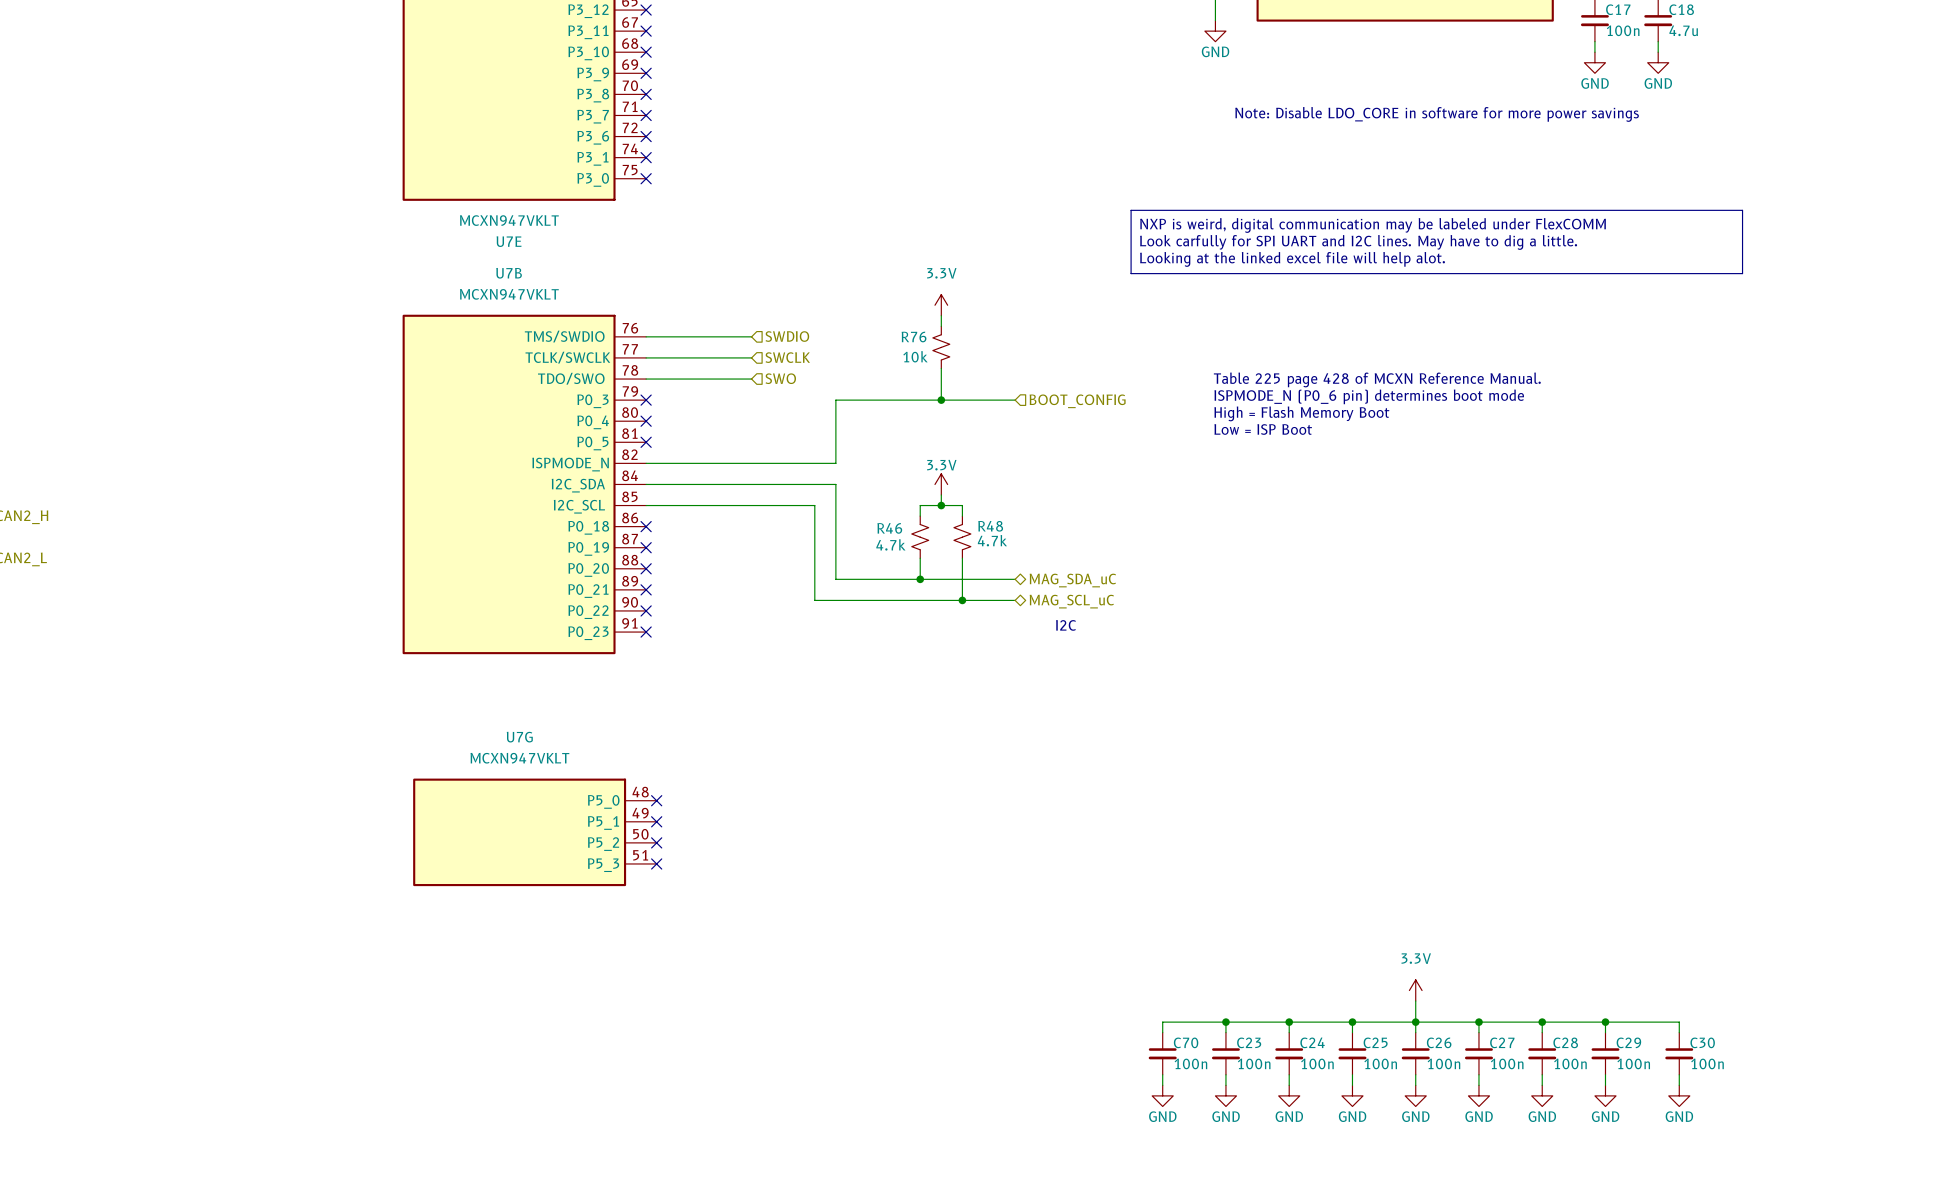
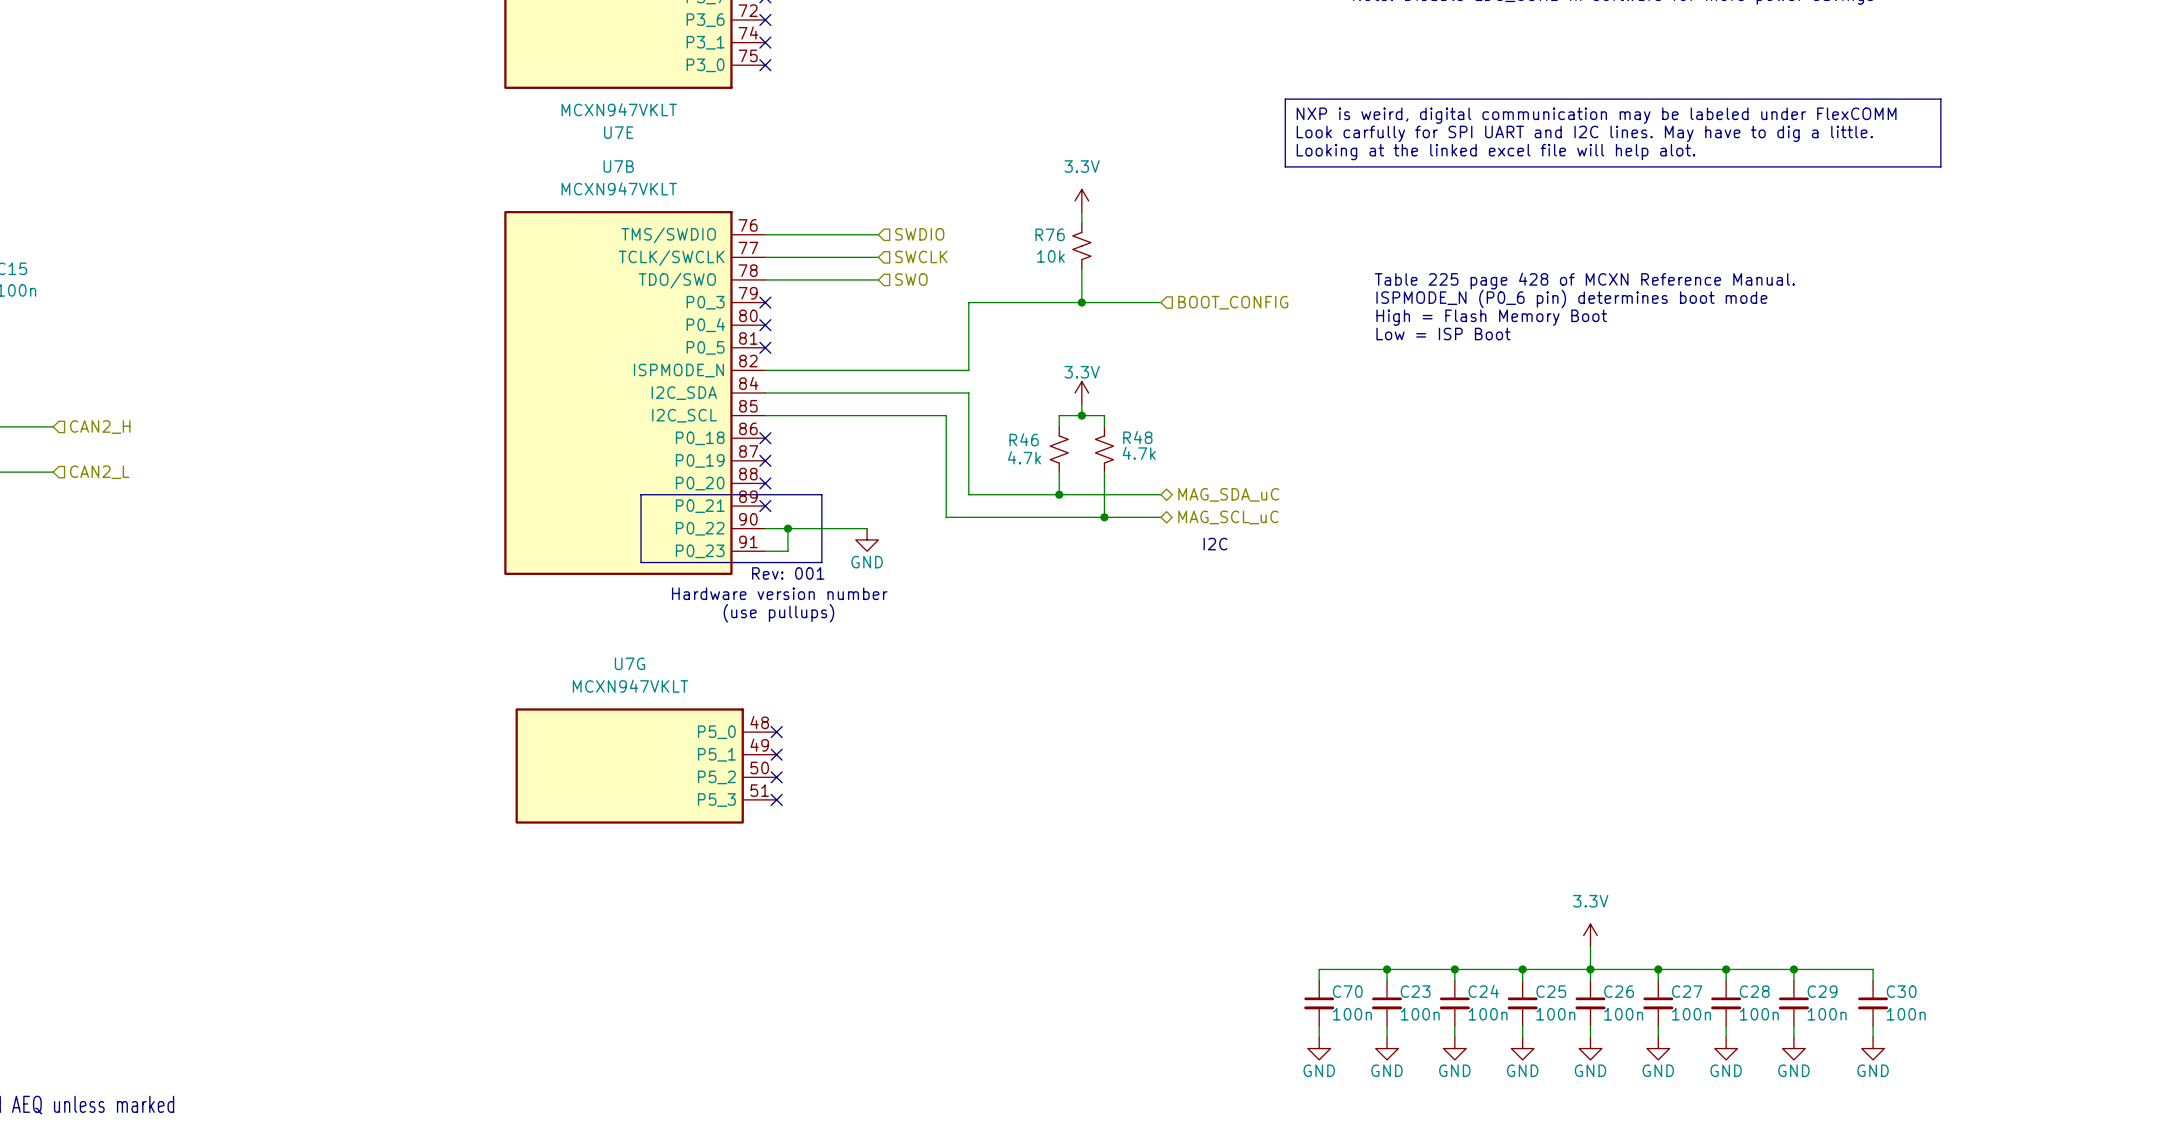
line: none -> (641, 494) (821, 494) (821, 562) (641, 562) (641, 494)
wire: none -> (765, 528) (867, 528)
no-connect mark: (646, 610) -> none
wire: none -> (787, 528) (787, 551) (765, 551)
junction: none -> (787, 528)
power symbol: none -> GND (867, 539)
no-connect mark: (646, 632) -> none
text: none -> Rev: 001 (788, 573)
text: none -> Hardware version number (779, 593)
text: none -> (use pullups) (778, 613)

